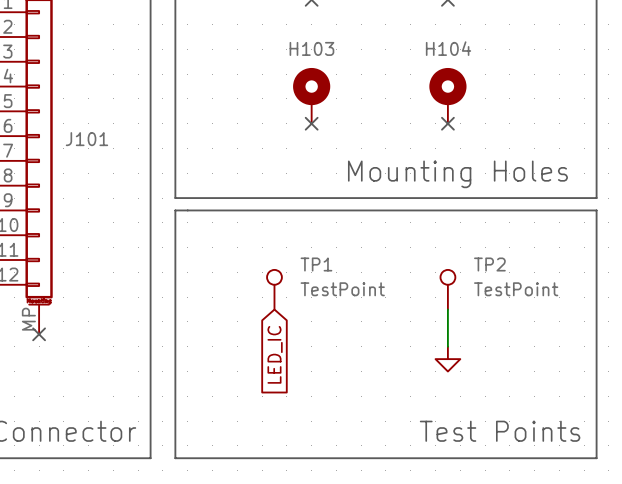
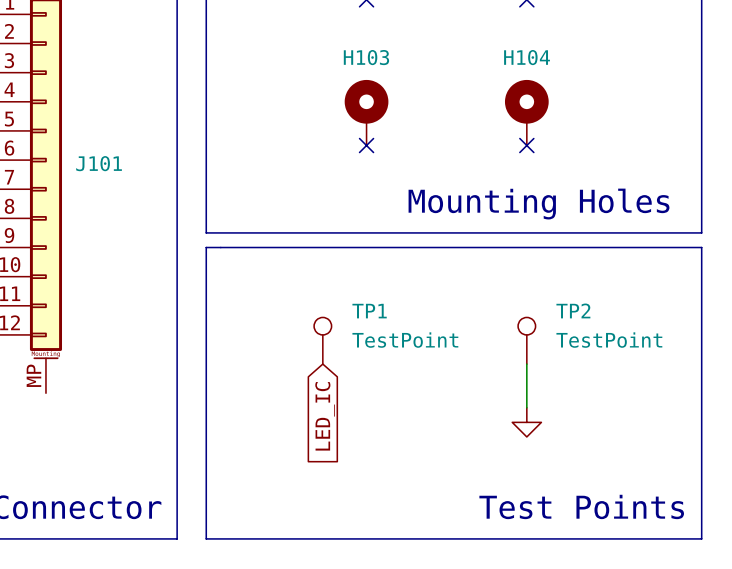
no-connect mark: (39, 334) -> none

